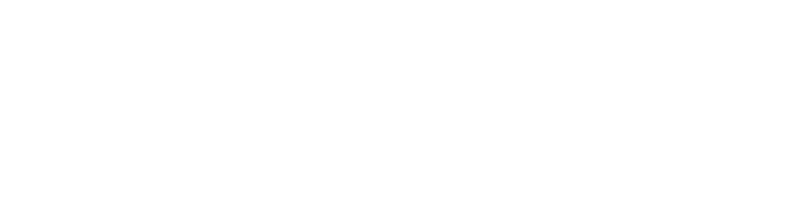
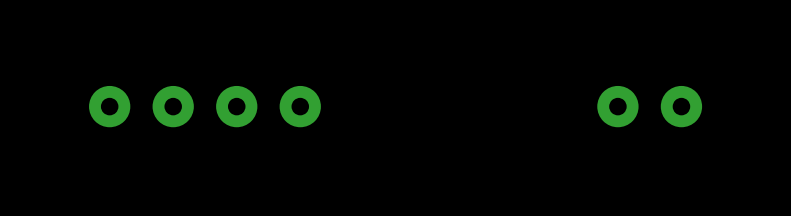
part: none -> (141, 106)
part: none -> (268, 106)
part: none -> (649, 106)

